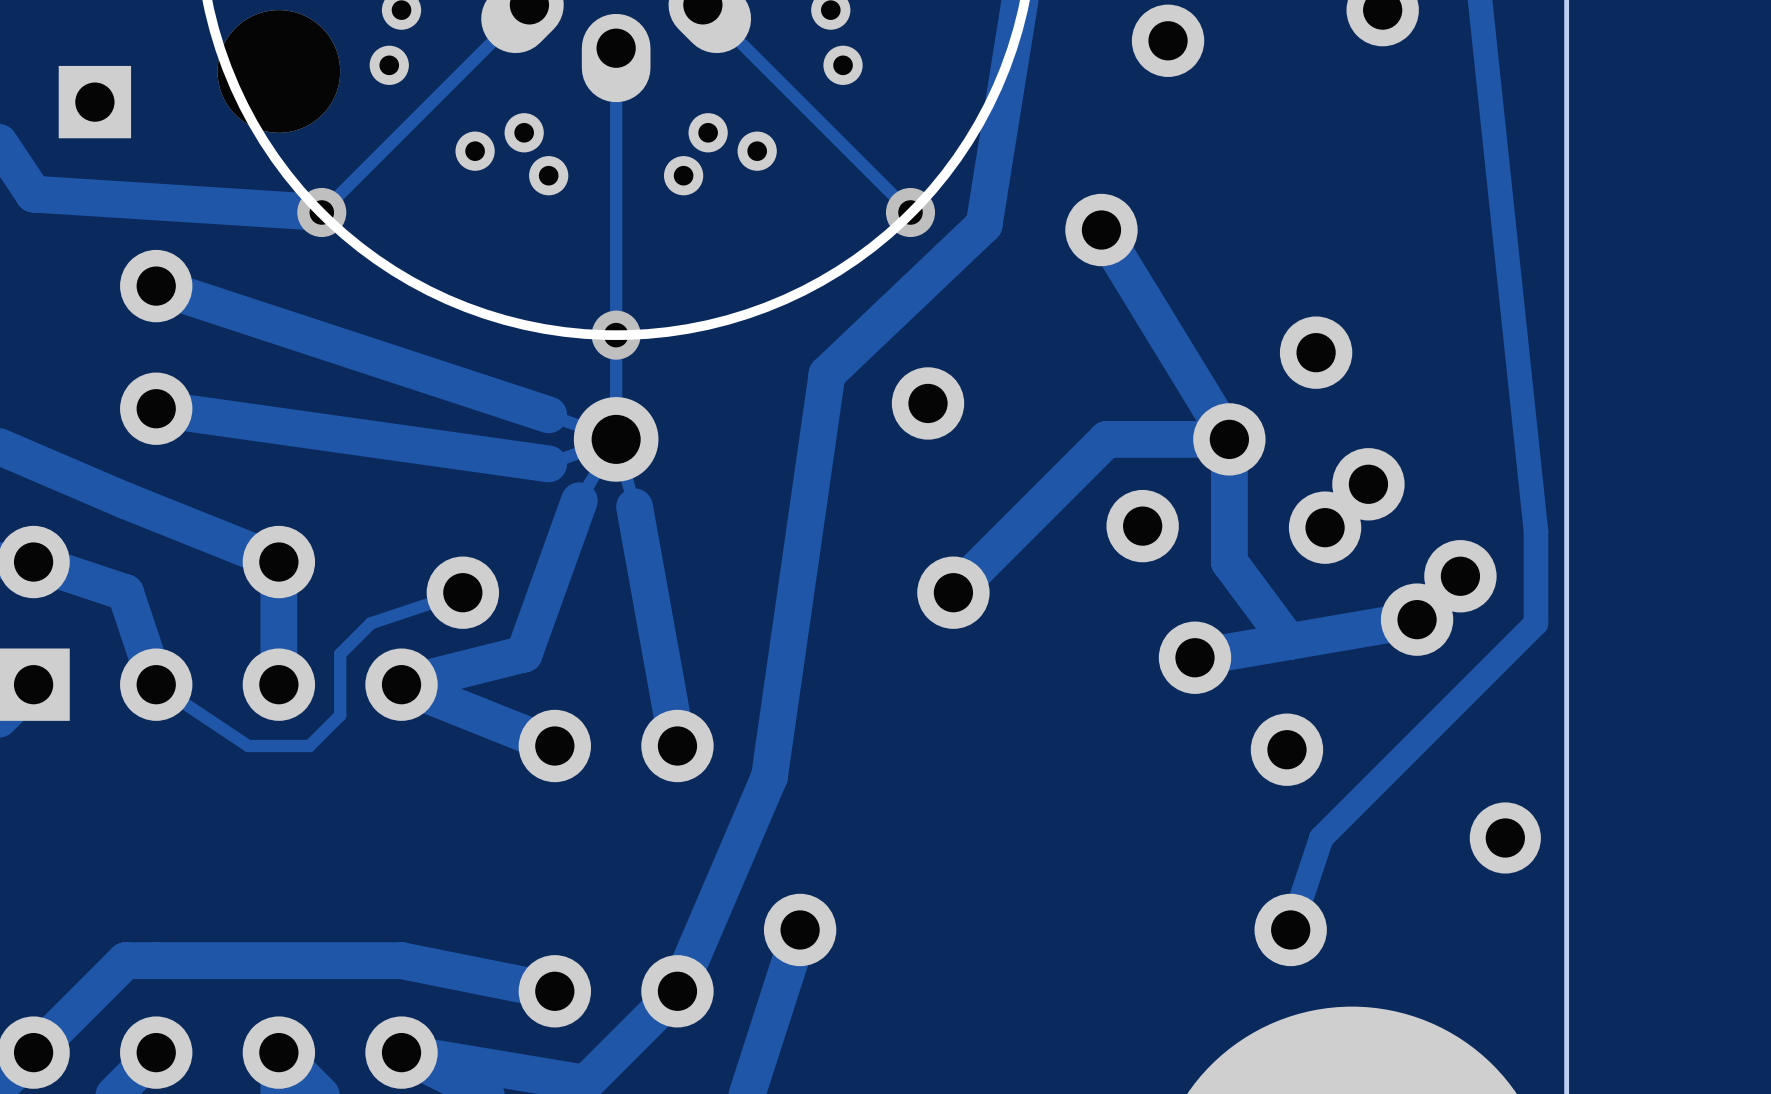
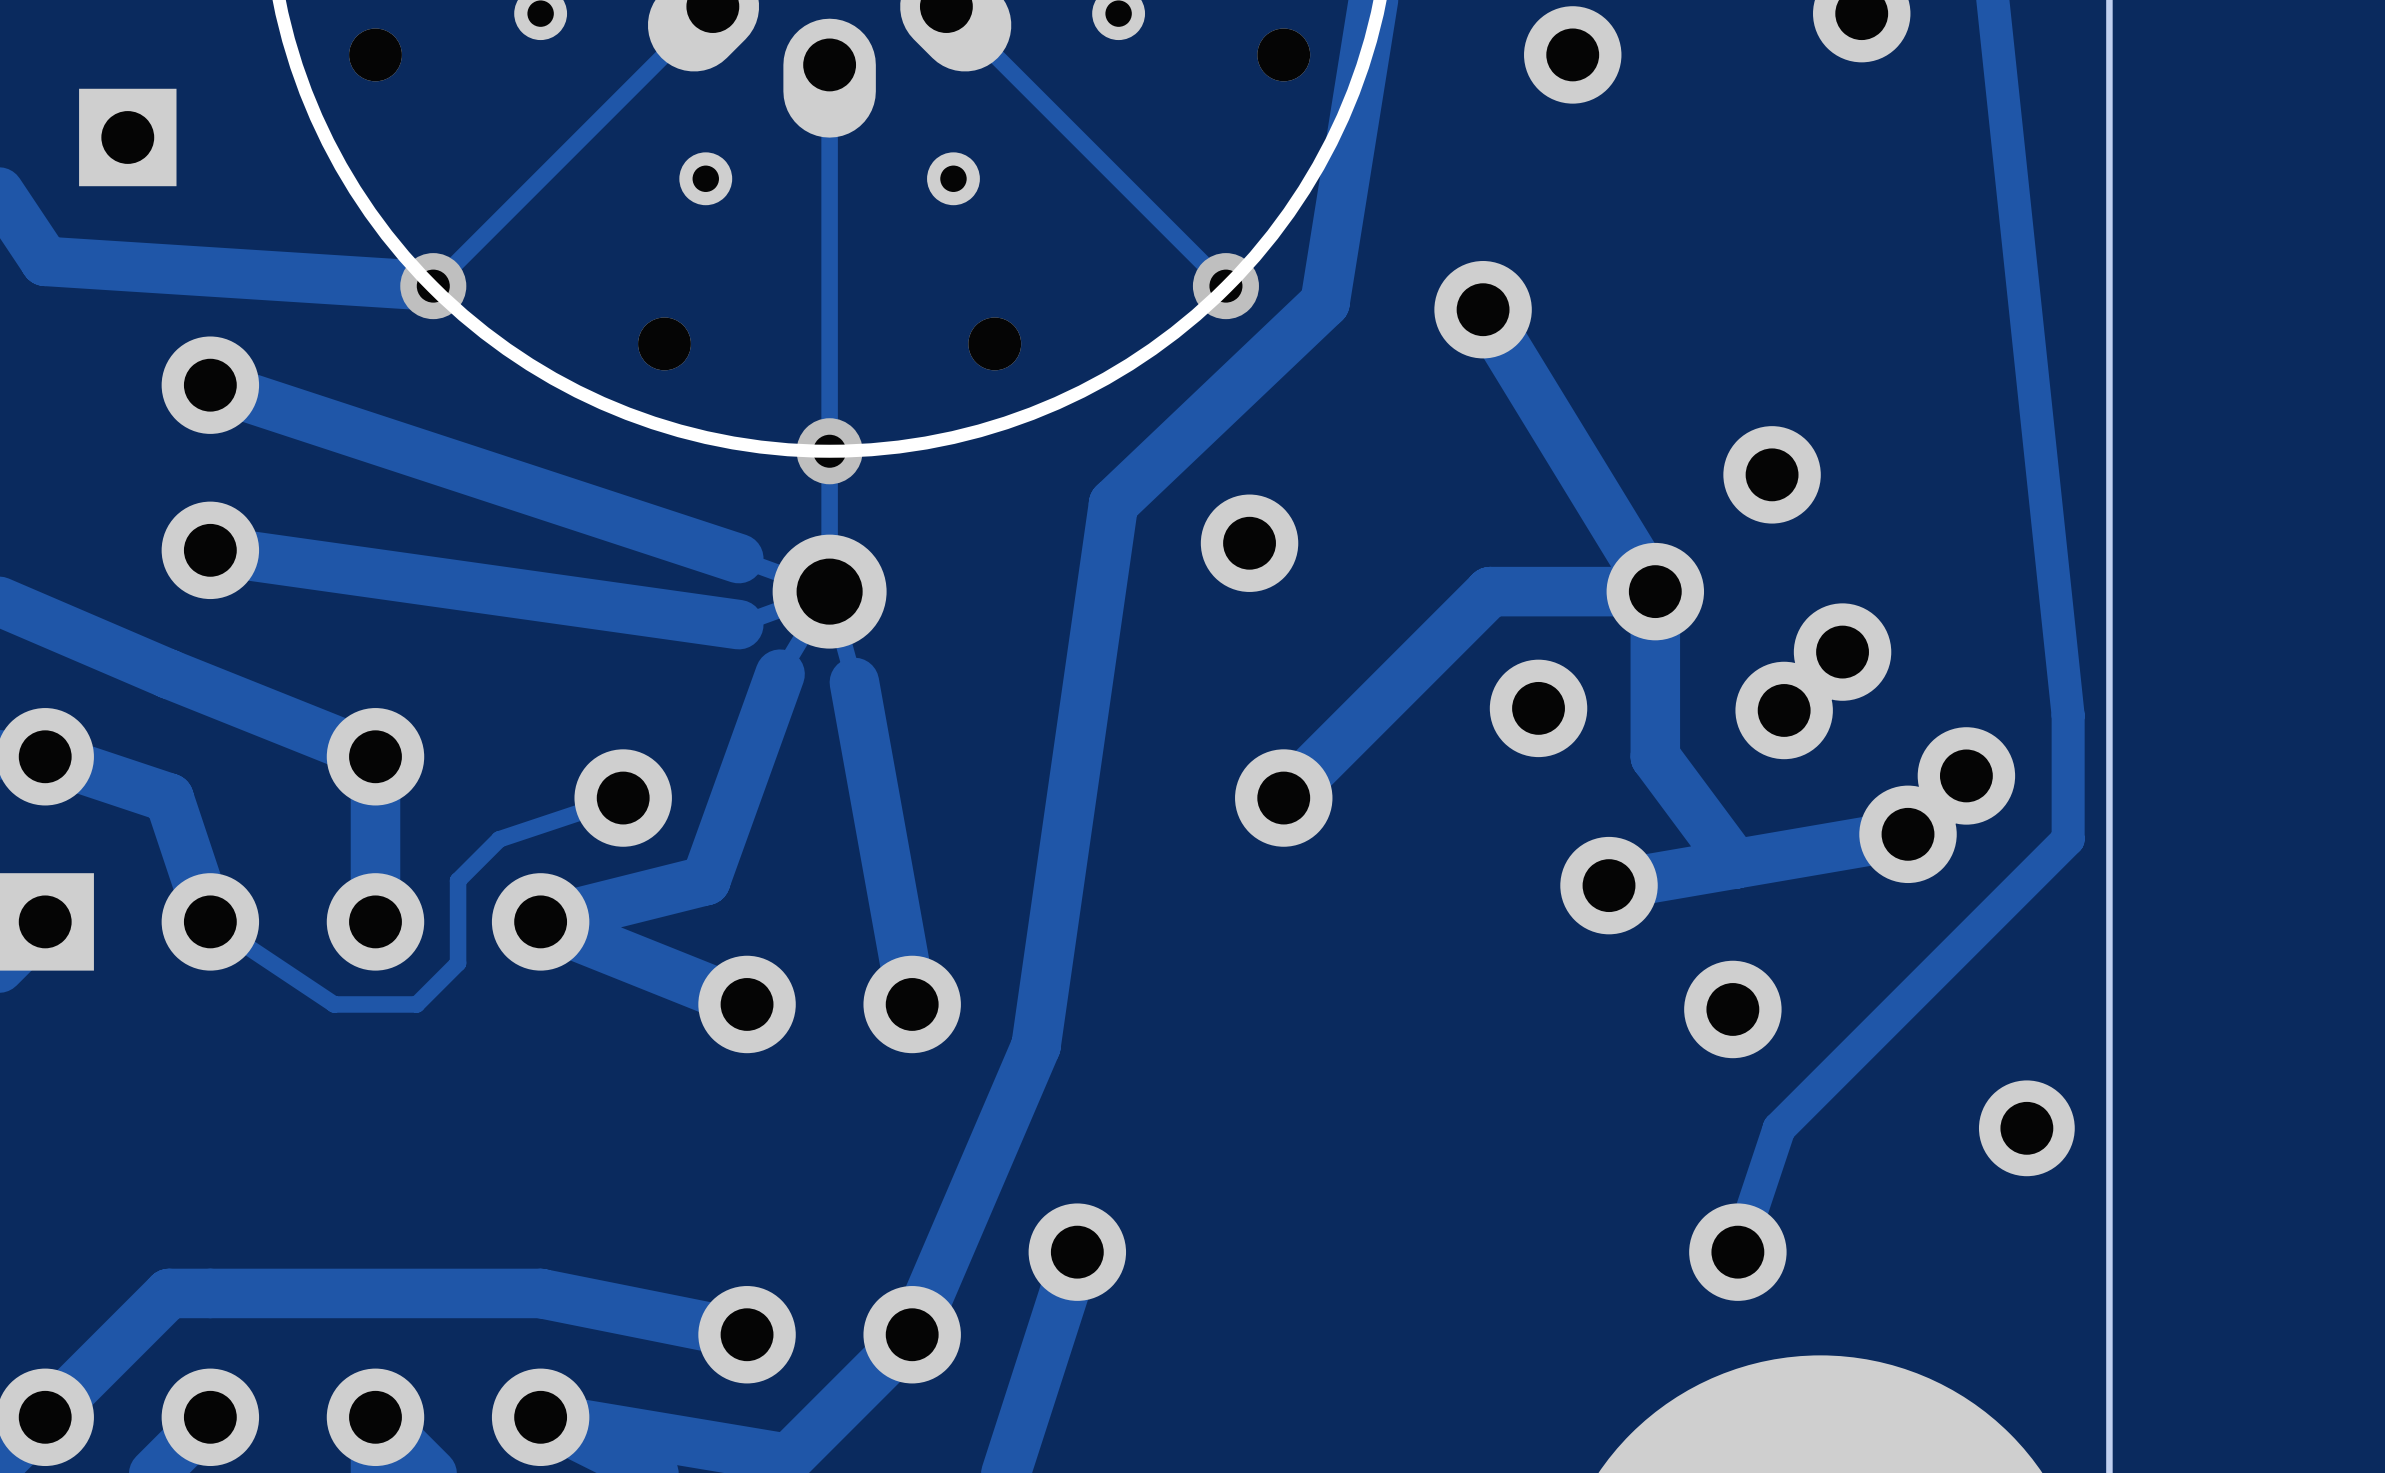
part footprint: [217, 10, 341, 133] -> [349, 28, 402, 82]
part: none -> (1283, 54)
part: (389, 65) -> none
part: (843, 65) -> none
part: (475, 151) -> none
part: (757, 151) -> none
part: (548, 175) -> none
part: (683, 175) -> none
part: none -> (664, 343)
part: none -> (994, 343)

